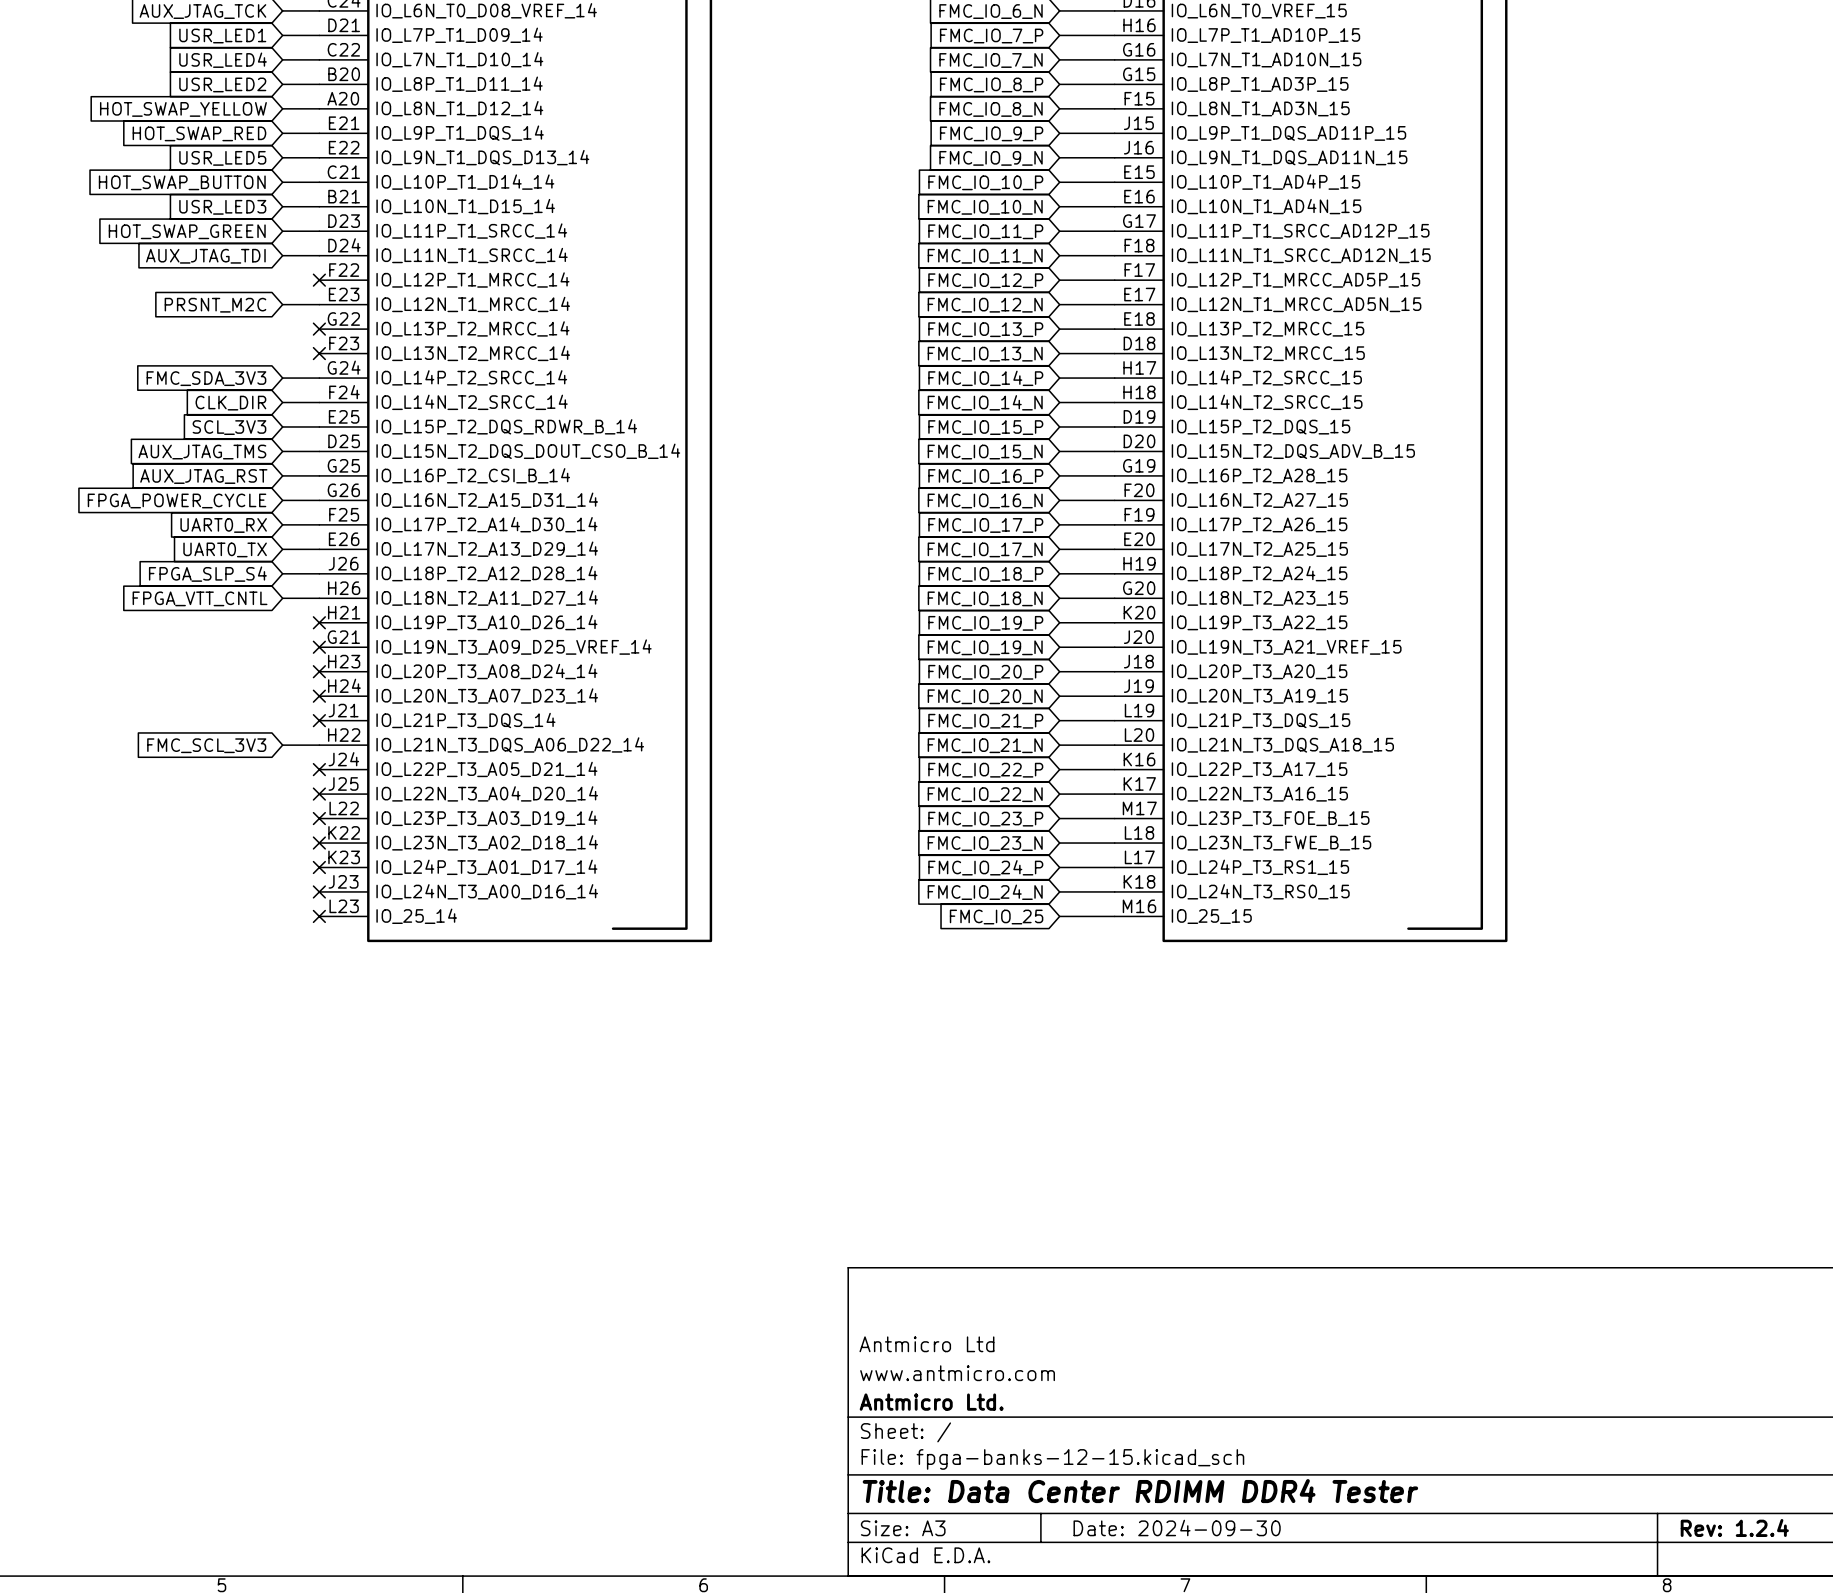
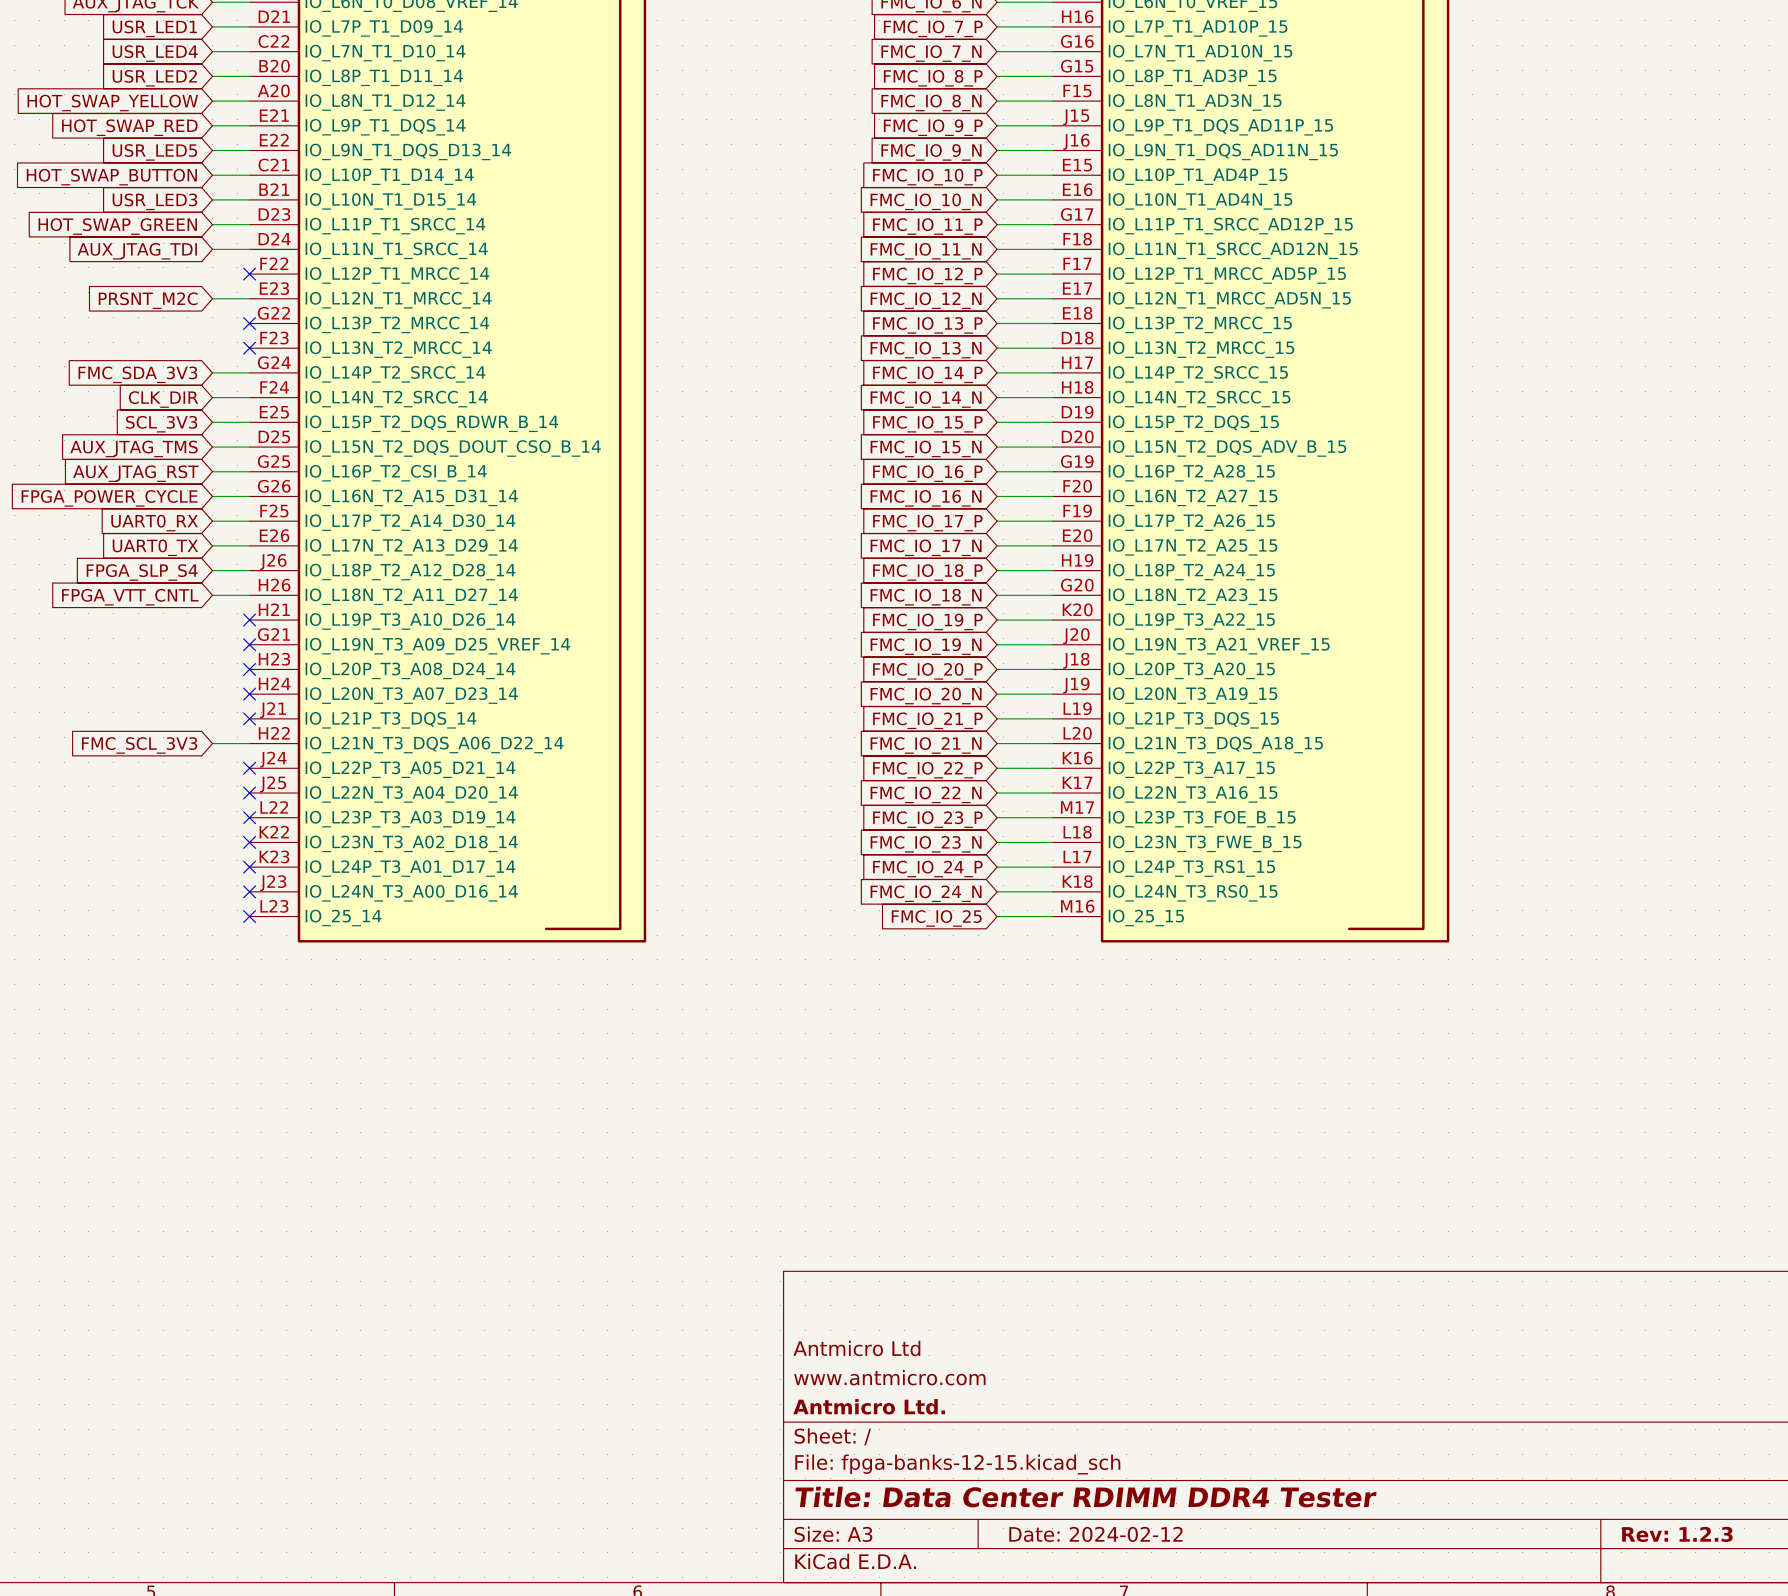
title block: Date: 2024-09-30 (1177, 1527) -> Date: 2024-02-12 (1095, 1534)
title block: Rev: 1.2.4 (1734, 1527) -> Rev: 1.2.3 (1677, 1534)

